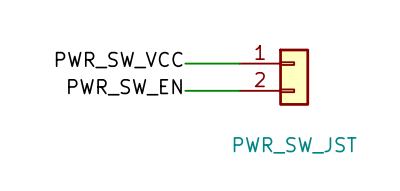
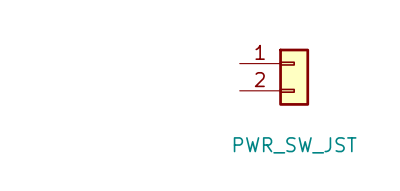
label: PWR_SW_VCC (119, 60) -> none
wire: (185, 63) (239, 63) -> none
label: PWR_SW_EN (124, 87) -> none
wire: (185, 90) (239, 90) -> none

